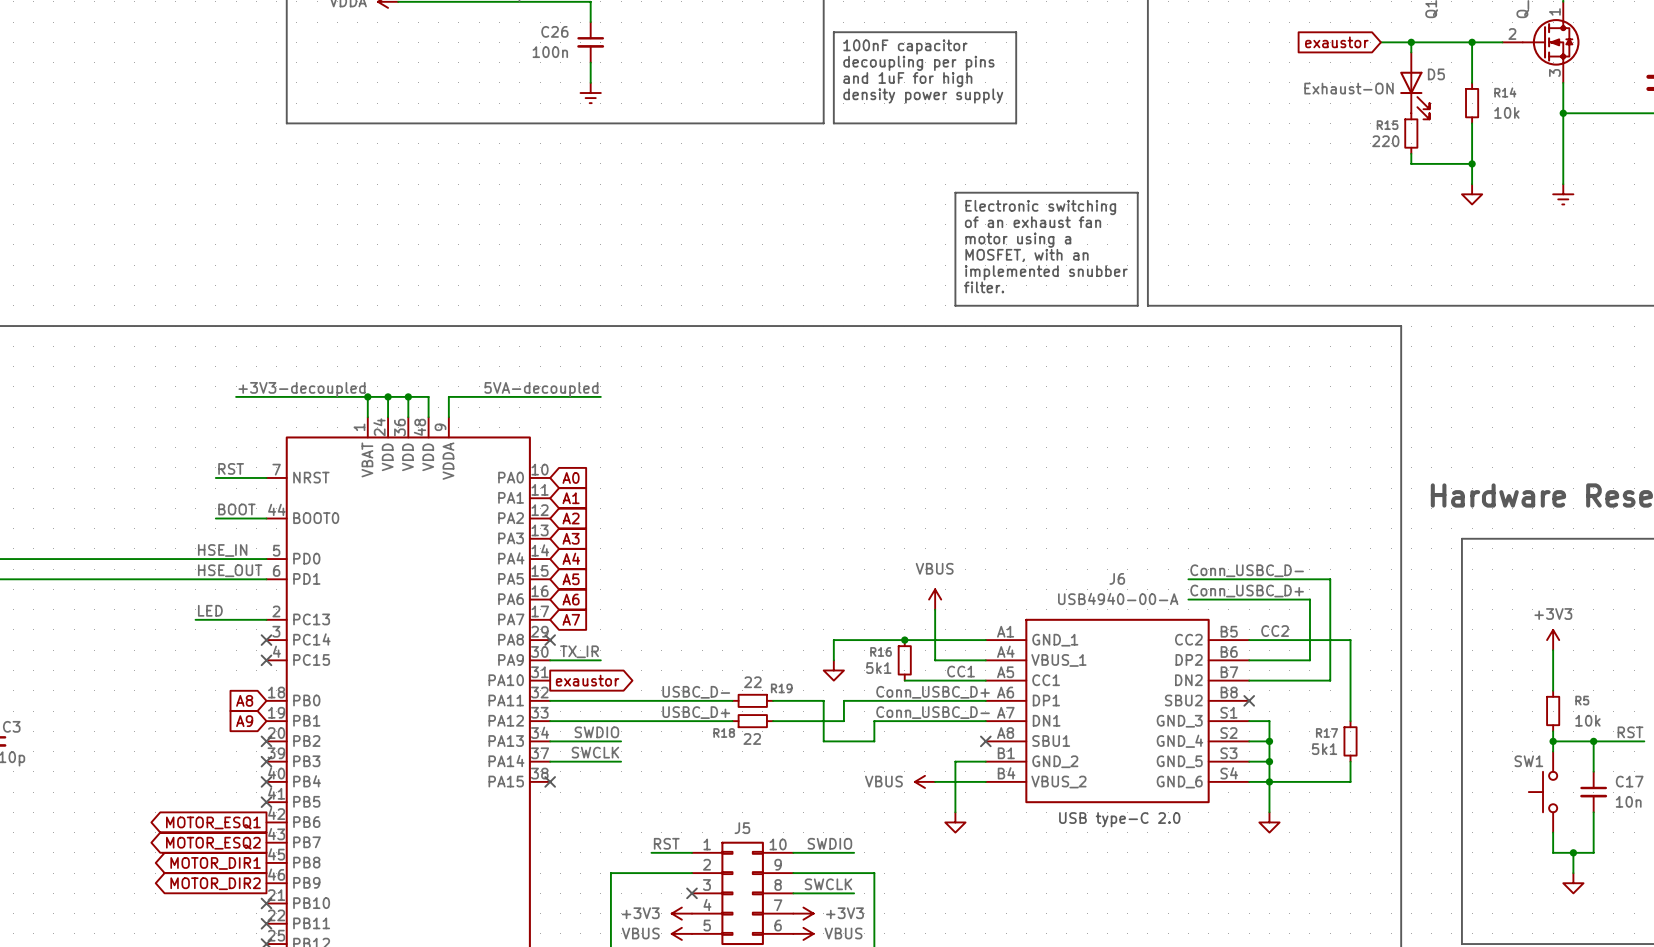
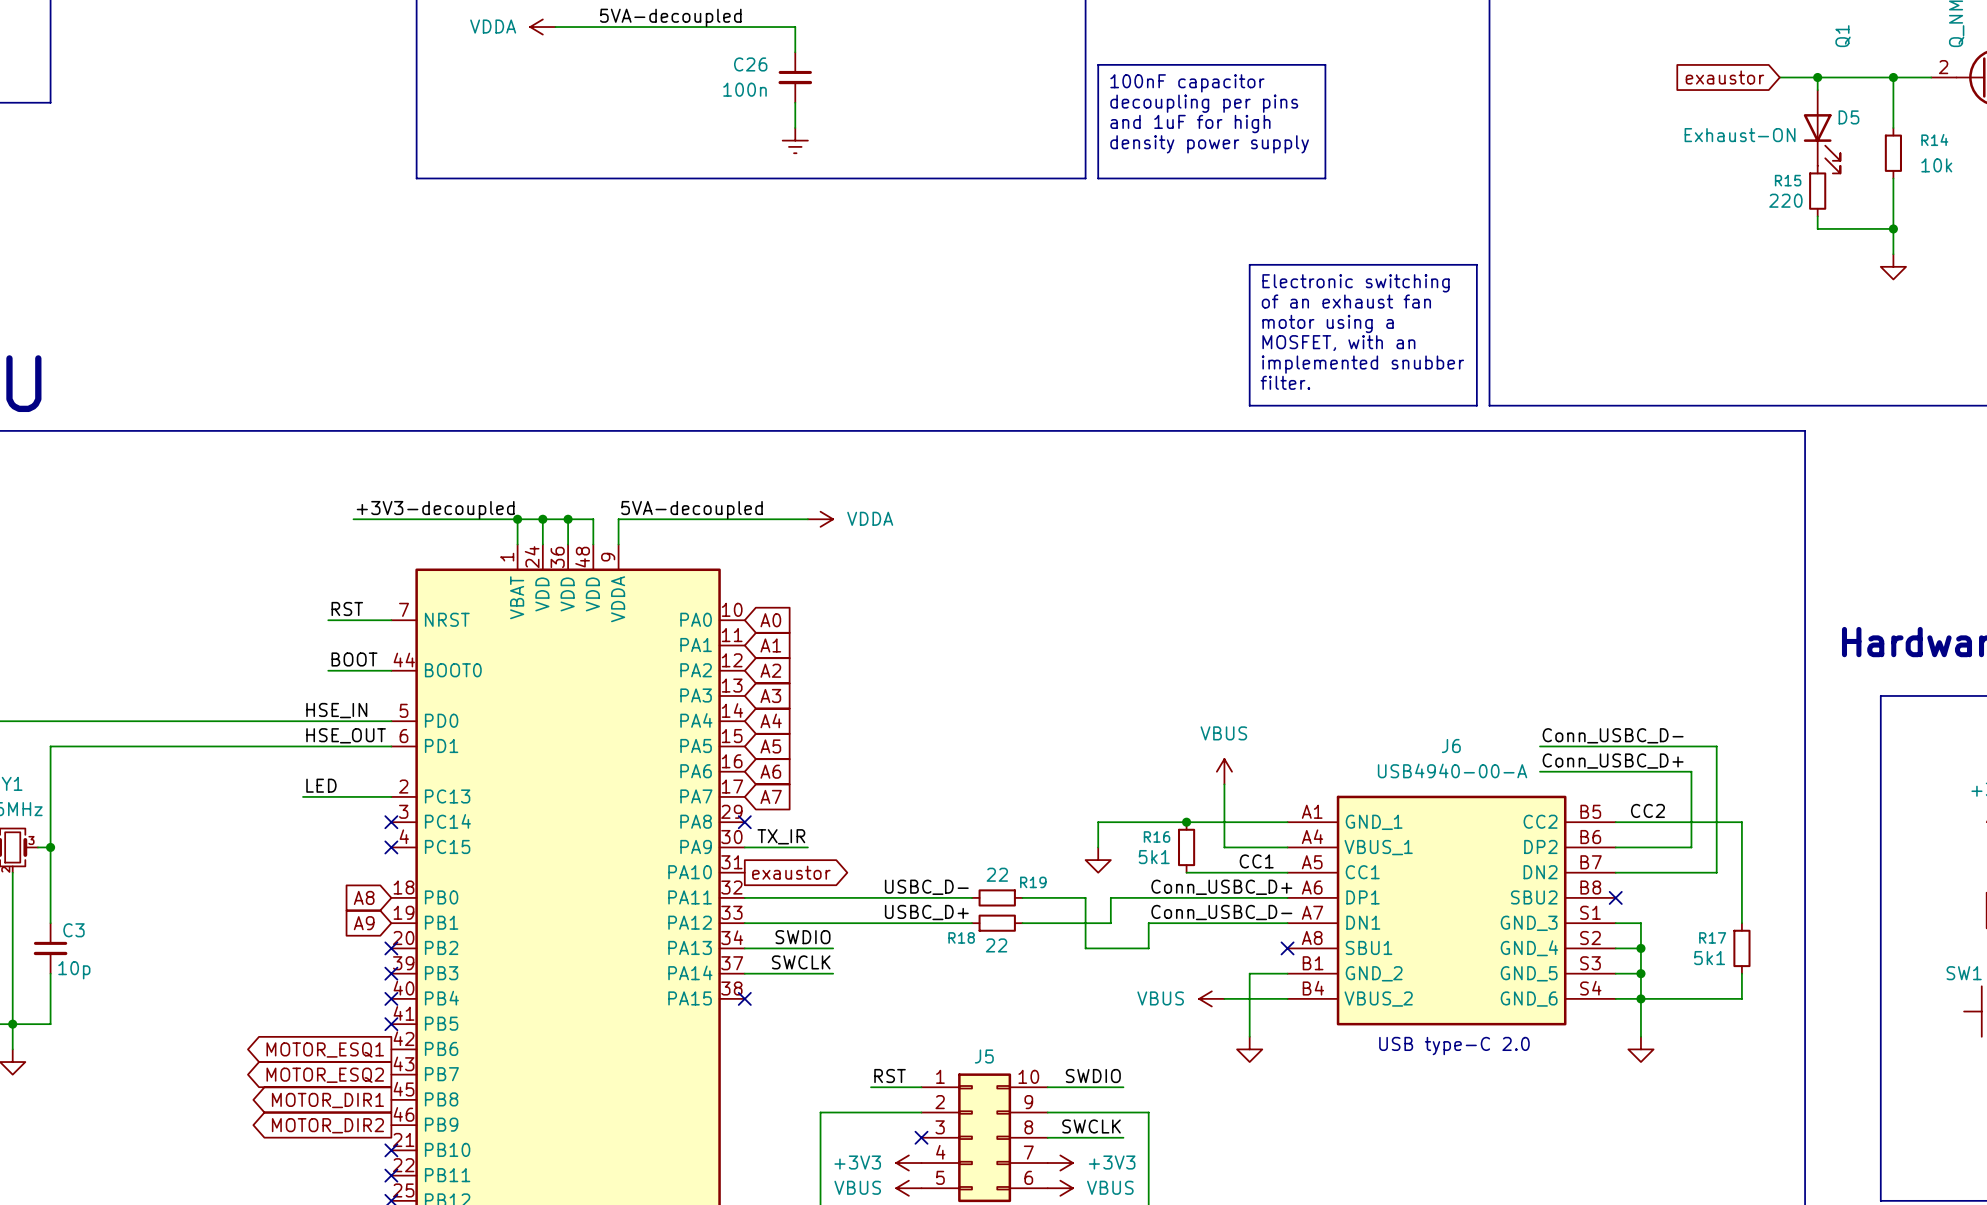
label position: 5VA-decoupled (541, 389) -> 5VA-decoupled (692, 510)
power symbol: none -> VDDA (820, 519)

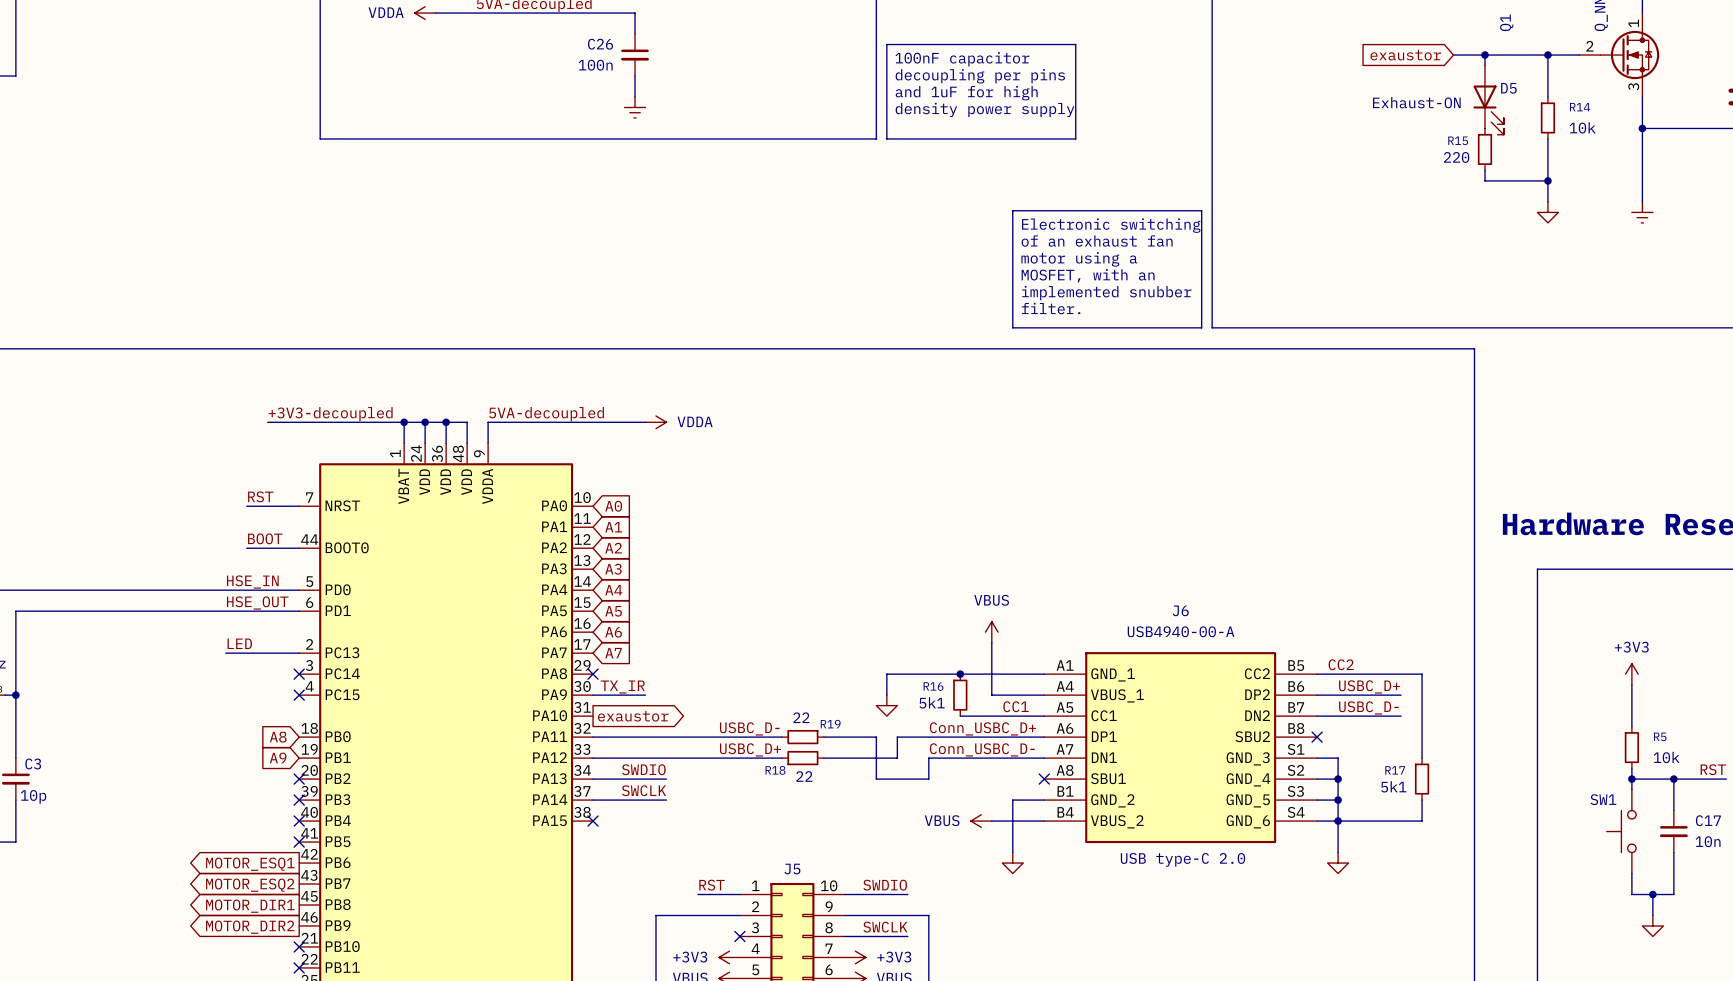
label: Conn_USBC_D- (1613, 735) -> none
wire: (1539, 746) (1716, 746) (1716, 872) -> none
label: Conn_USBC_D+ (1613, 761) -> none
wire: (1539, 771) (1691, 771) (1691, 847) -> (1401, 695) (1380, 695)
label: none -> USBC_D+ (1369, 686)
label: none -> USBC_D- (1368, 707)

